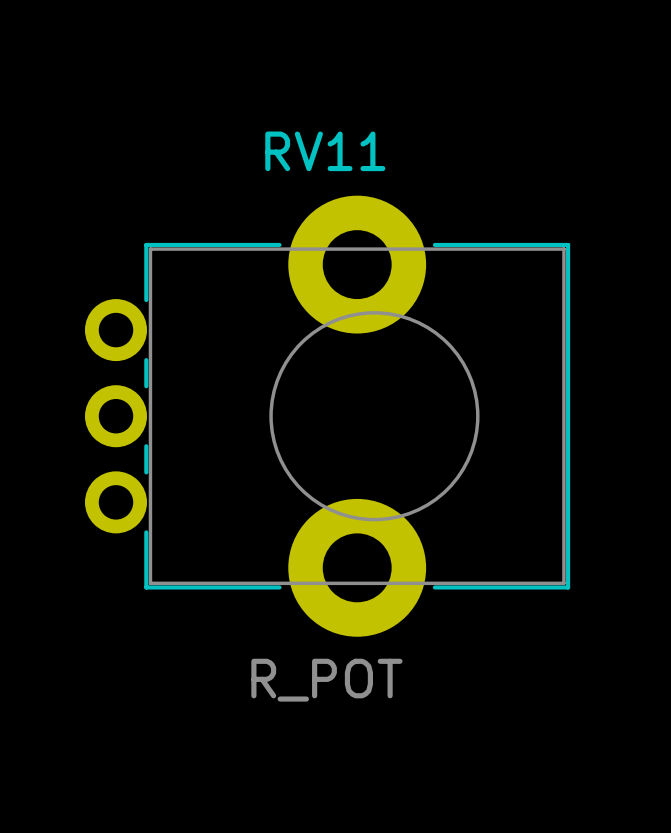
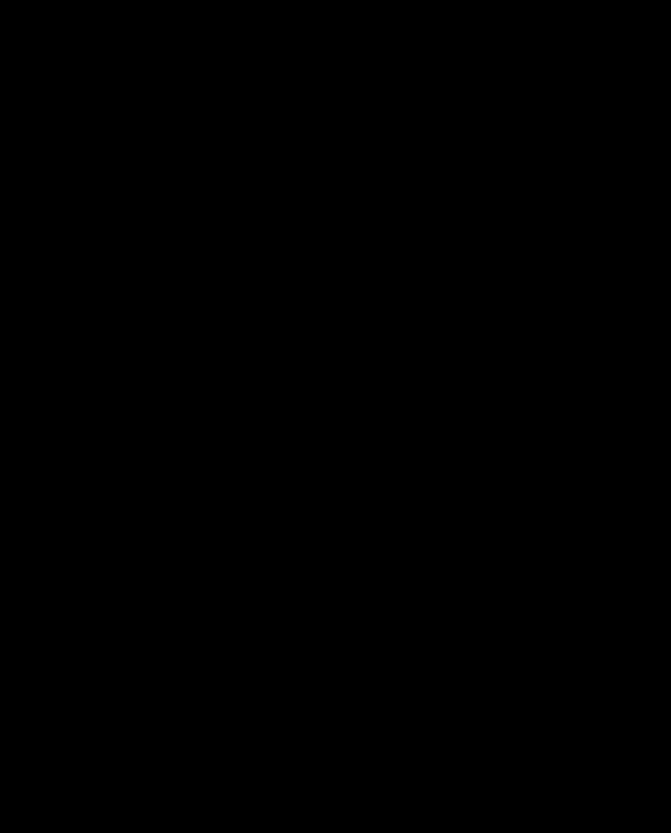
RV11: R_POT (327, 416) -> none

